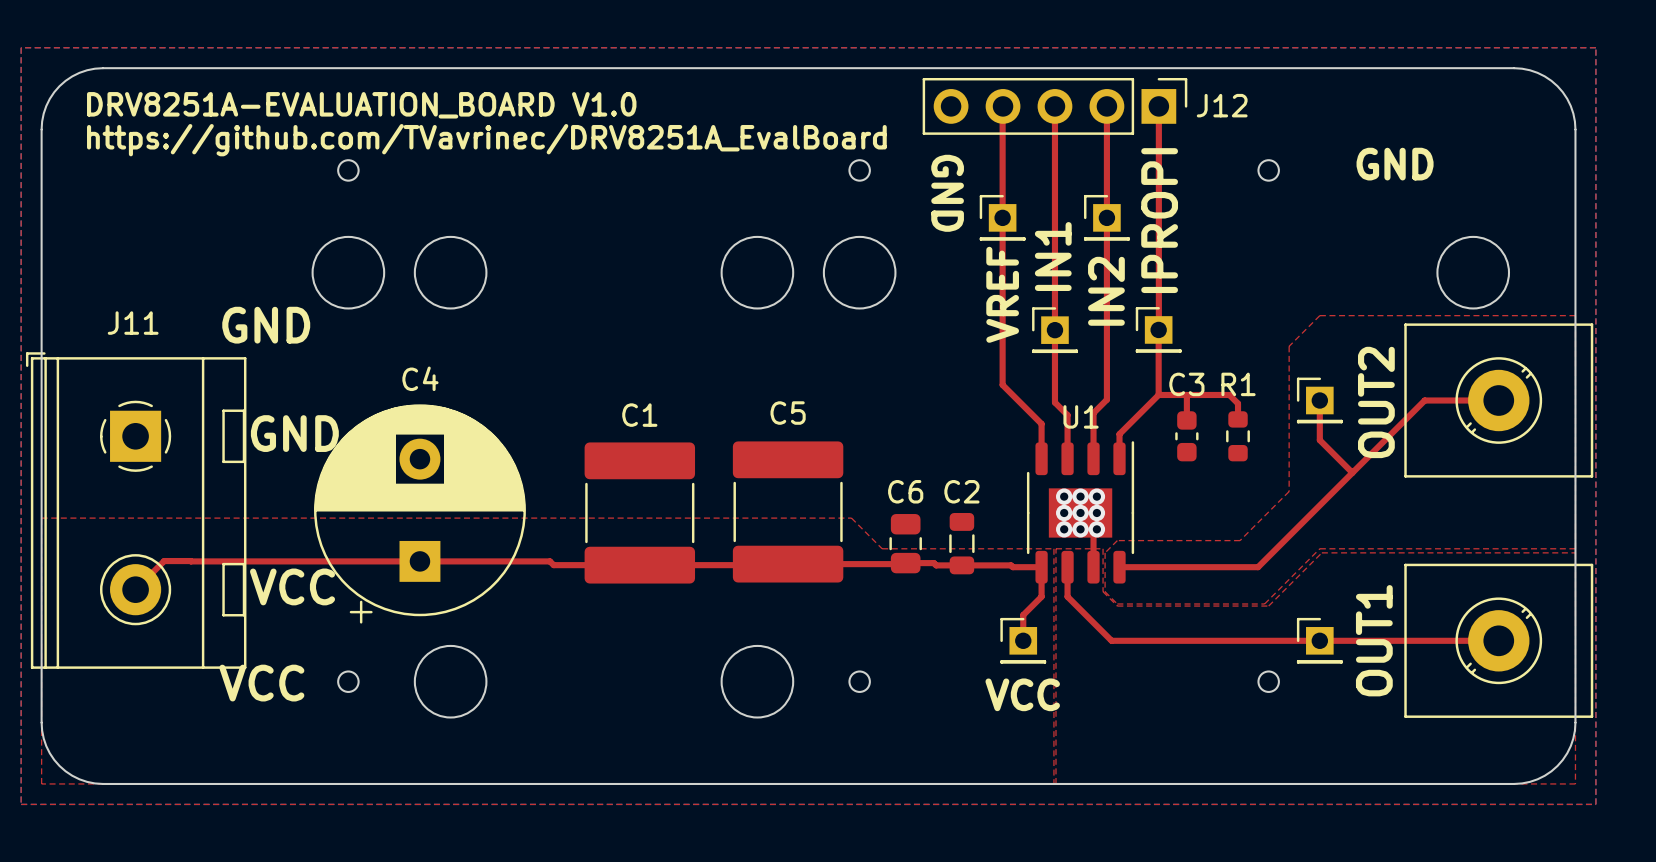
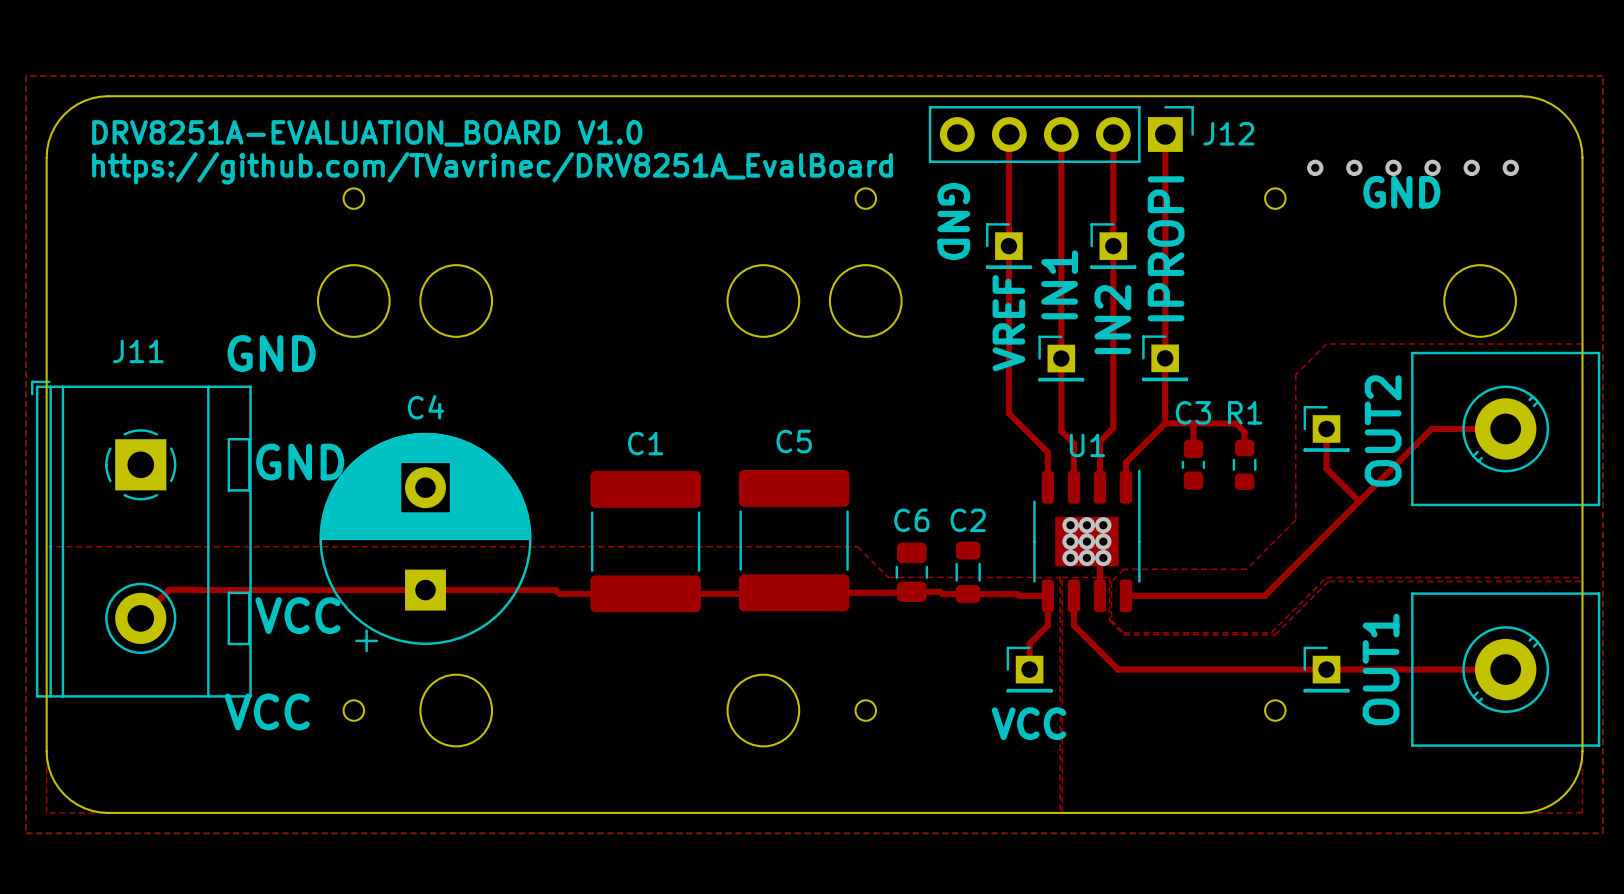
via: none -> (1315, 167)
via: none -> (1354, 167)
via: none -> (1393, 167)
via: none -> (1432, 167)
via: none -> (1471, 167)
via: none -> (1510, 167)

